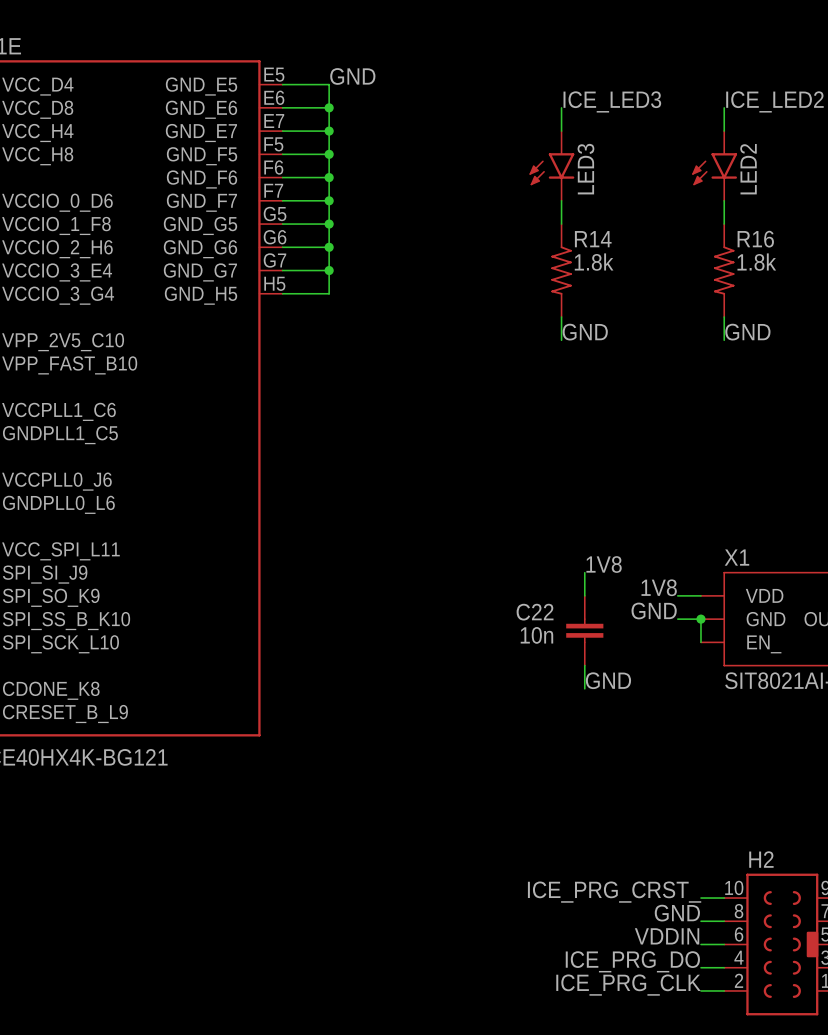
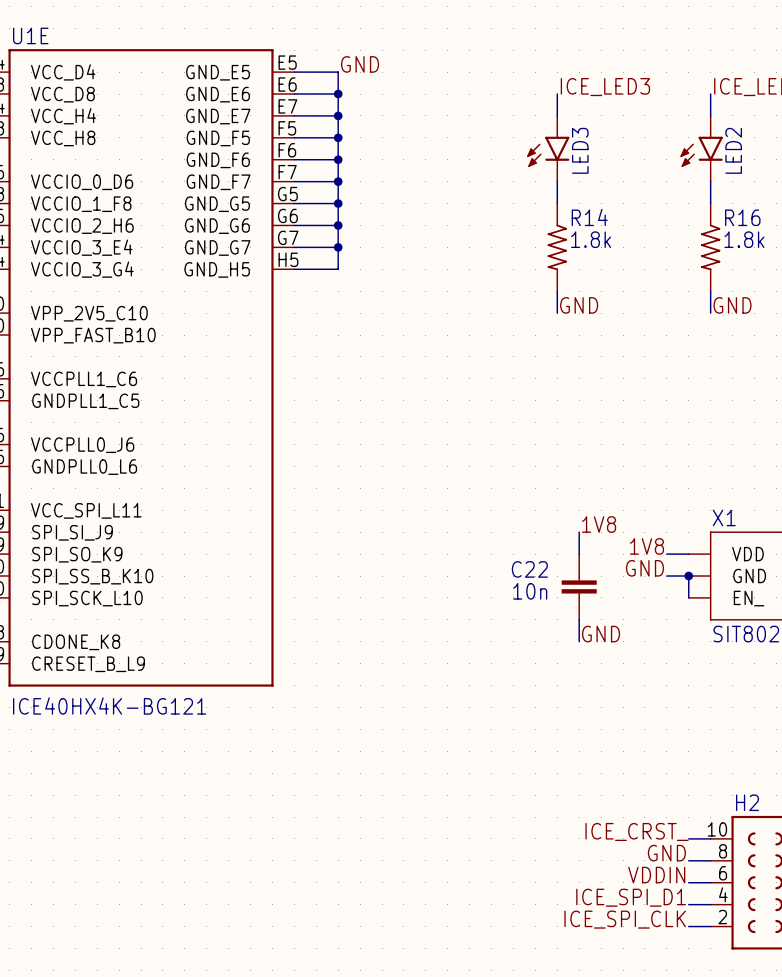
label: ICE_PRG_CRST_ (614, 892) -> ICE_CRST_ (637, 831)
label: ICE_PRG_DO (632, 961) -> ICE_SPI_D1 (631, 897)
label: ICE_PRG_CLK (628, 985) -> ICE_SPI_CLK (625, 919)

